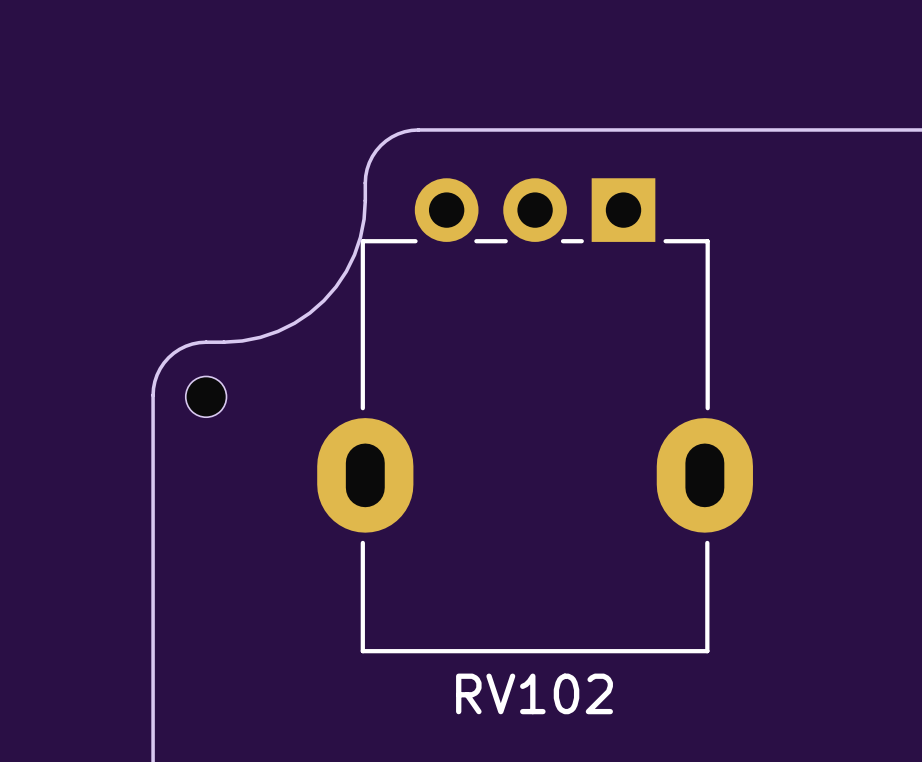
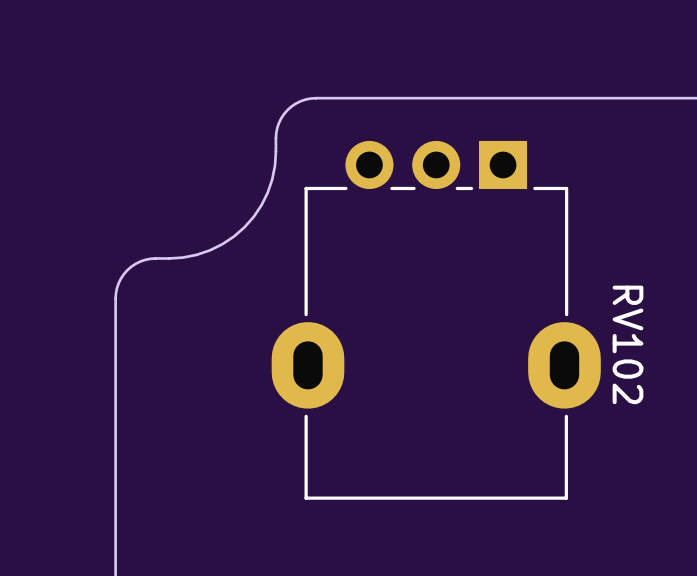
part: (206, 396) -> none
RV102 position: (535, 415) -> (436, 320)
RV102 name rotation: 0° (534, 693) -> 90° clockwise (628, 344)
RV102 name position: RV102 (534, 693) -> RV102 (628, 344)

